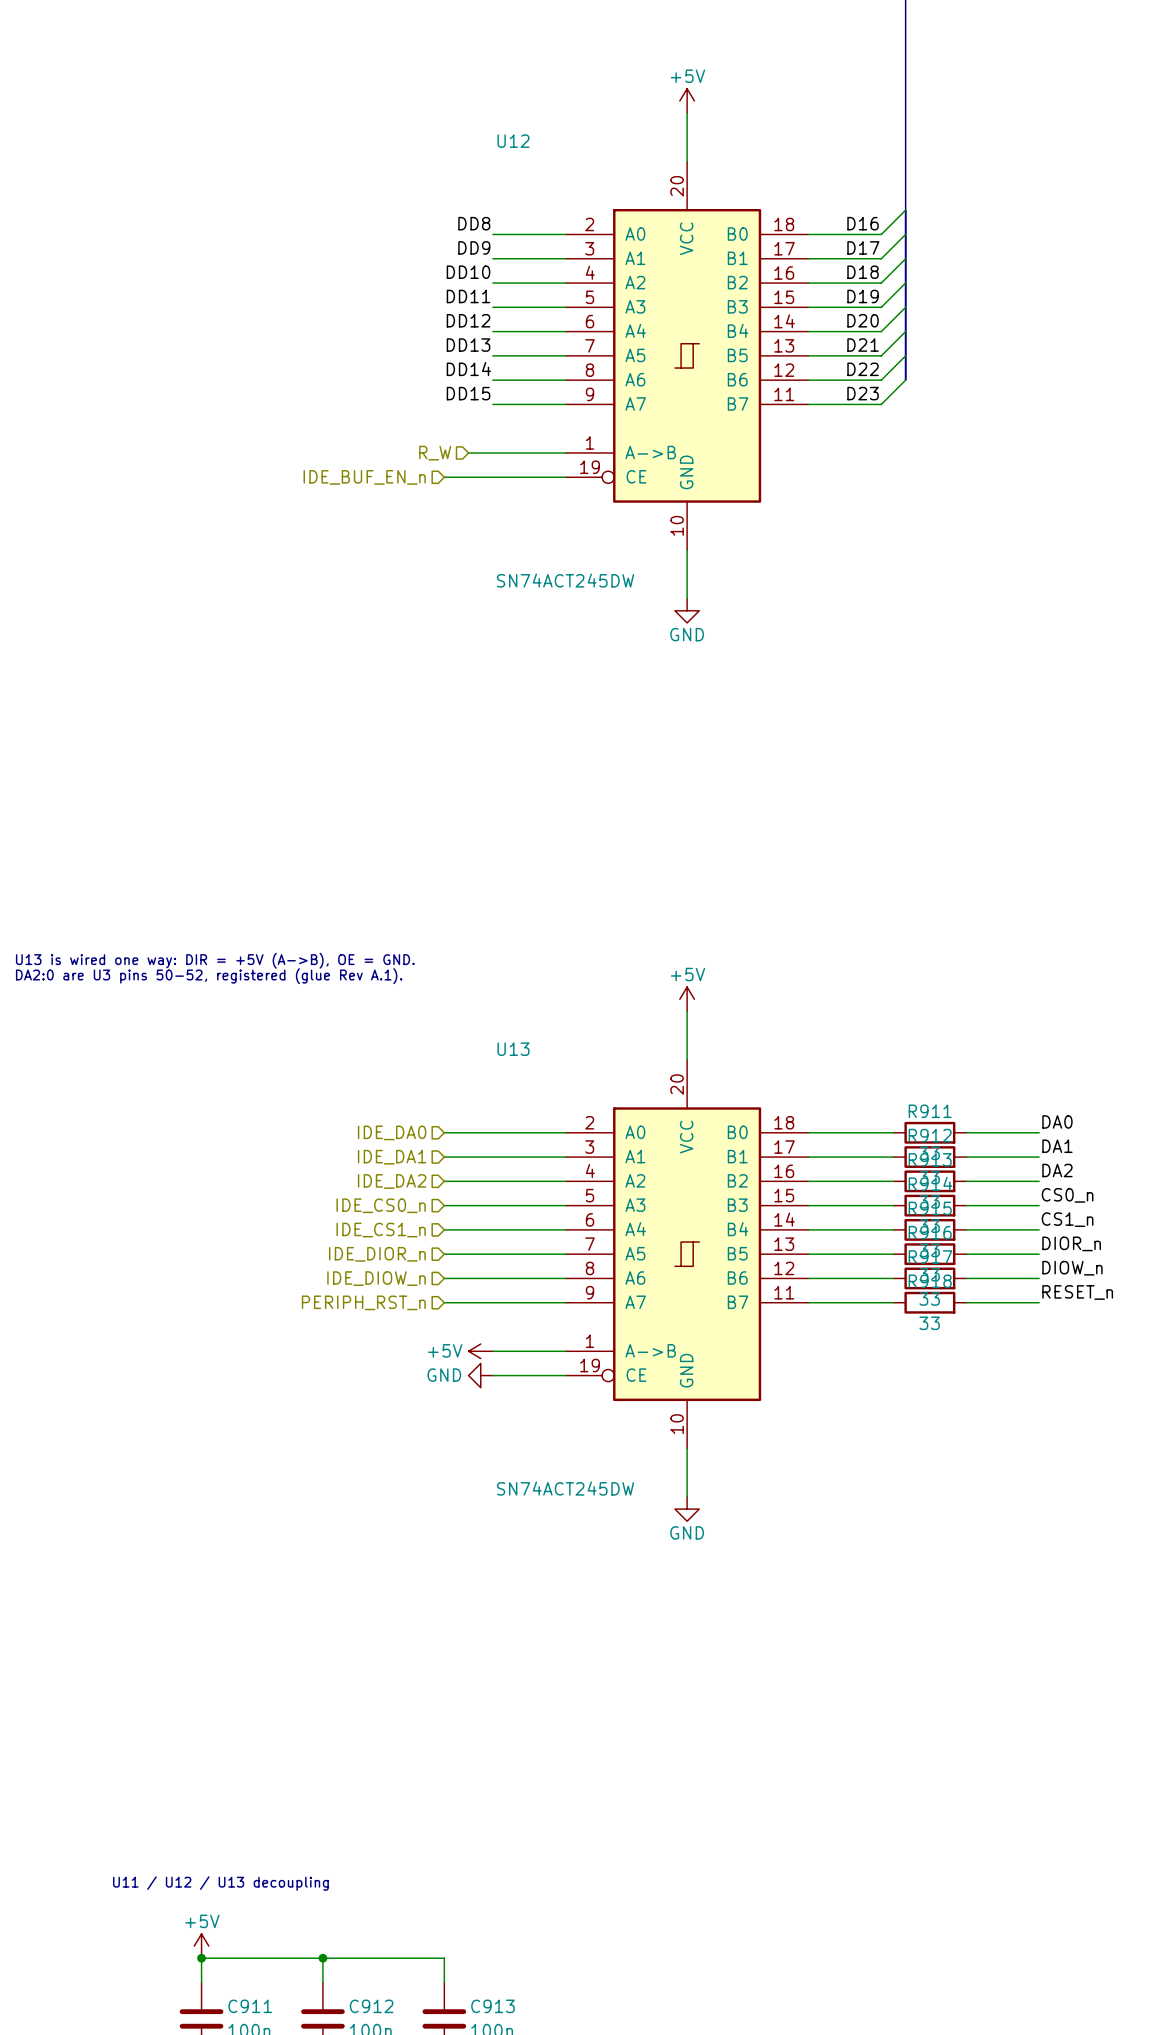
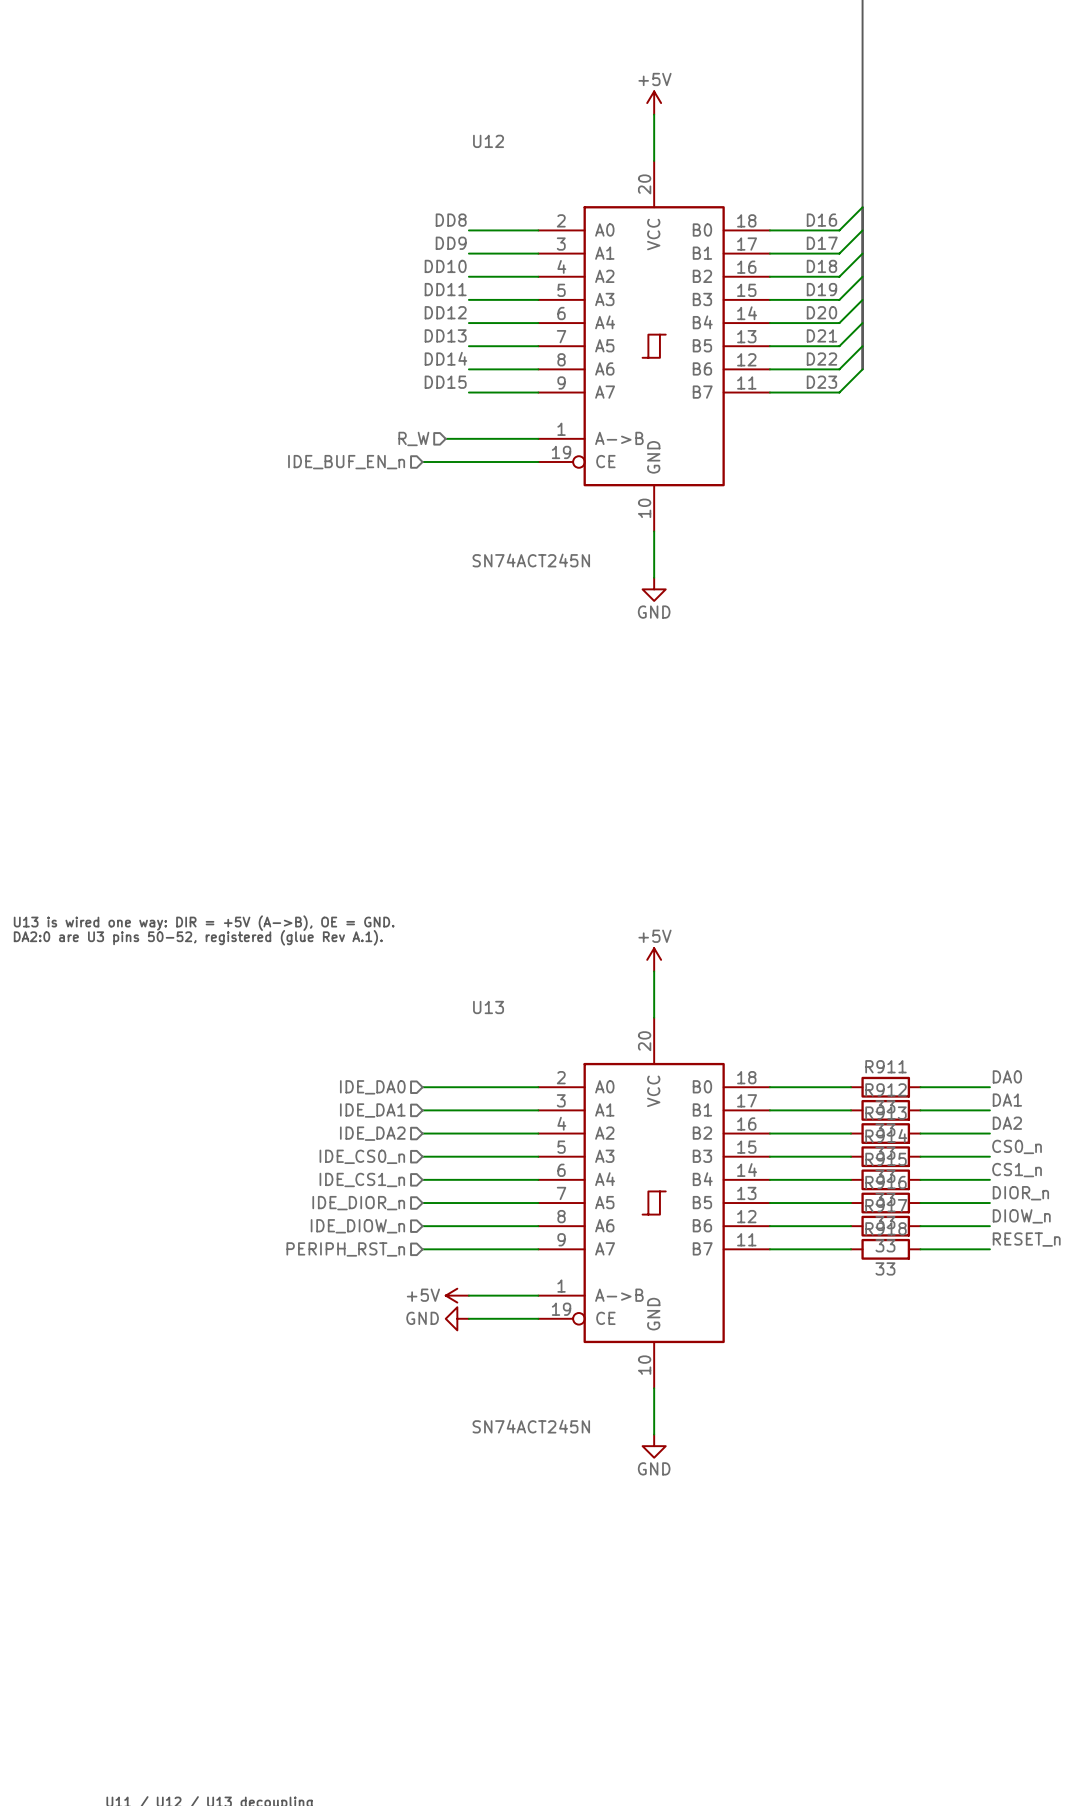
U12 value: SN74ACT245DW (565, 580) -> SN74ACT245N (531, 560)
U13 value: SN74ACT245DW (565, 1488) -> SN74ACT245N (531, 1426)

